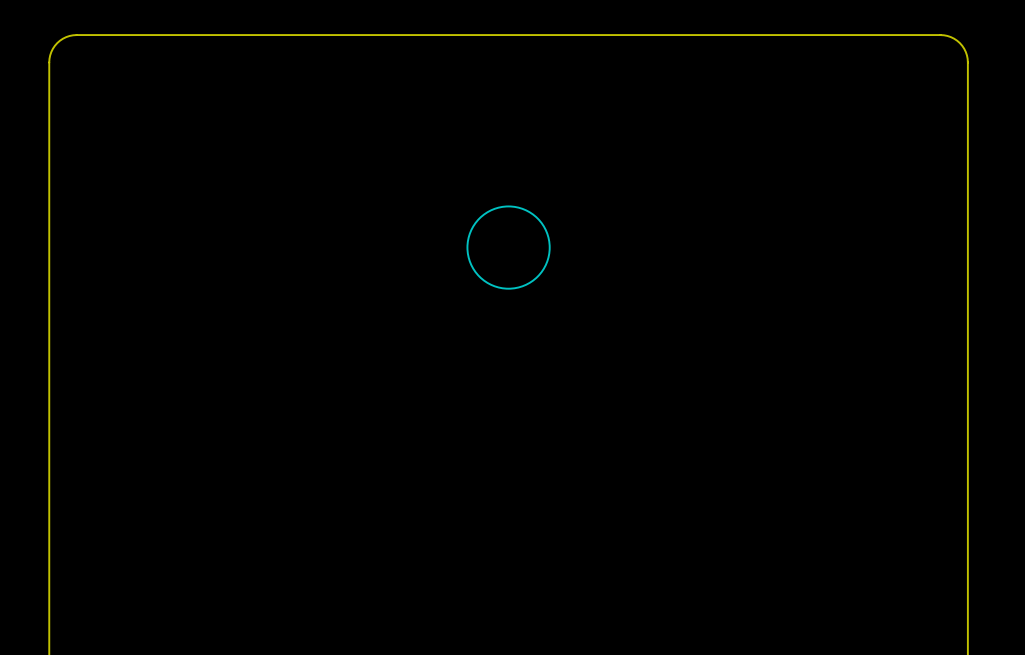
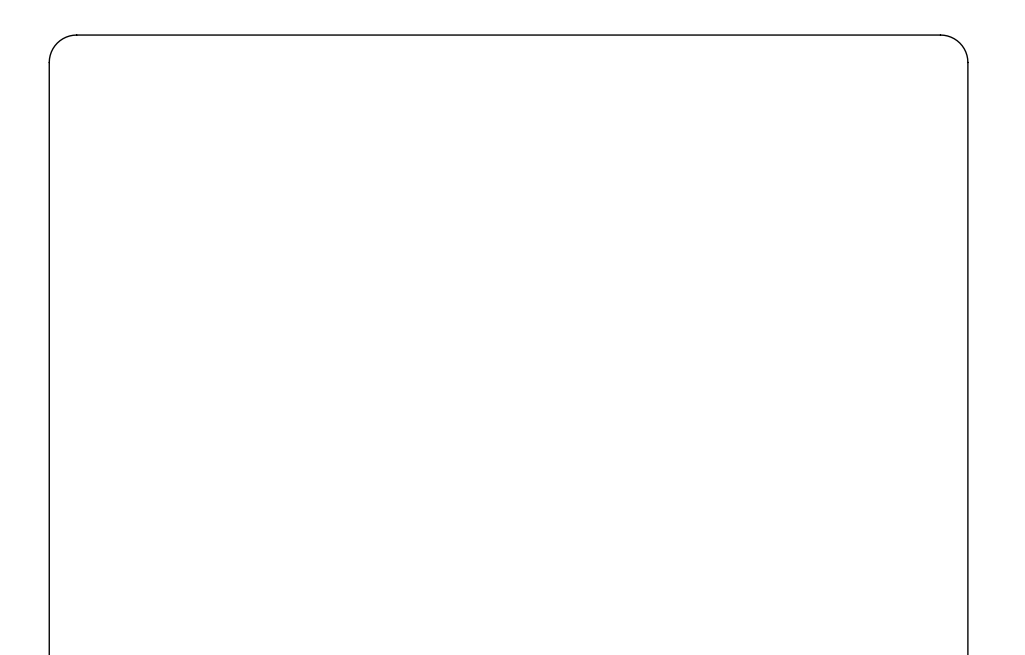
drawing: [466, 205, 551, 290] -> none

